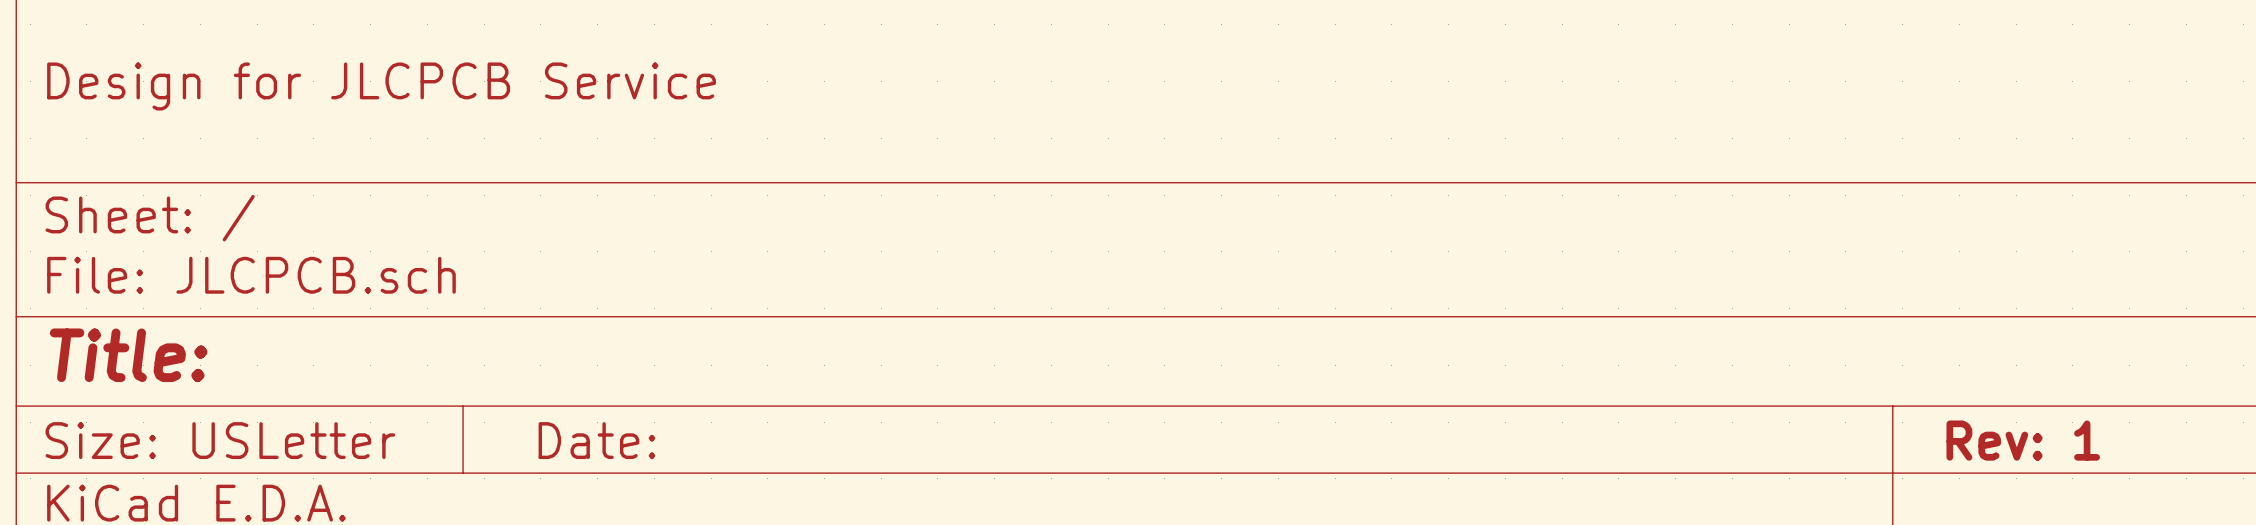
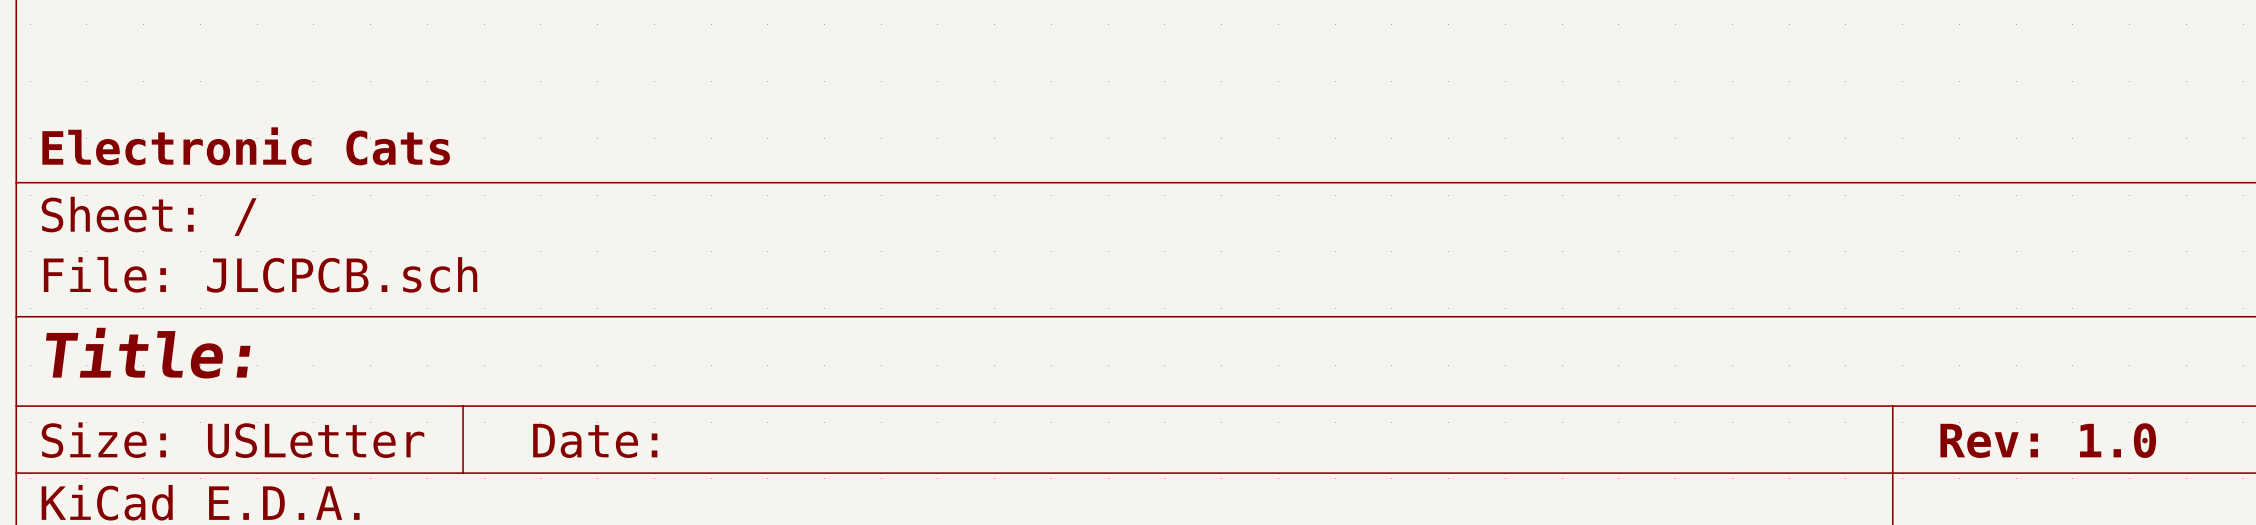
title block: Design for JLCPCB Service (381, 86) -> none
title block: none -> Electronic Cats (246, 146)
title block: Rev: 1 (2023, 440) -> Rev: 1.0 (2048, 440)

